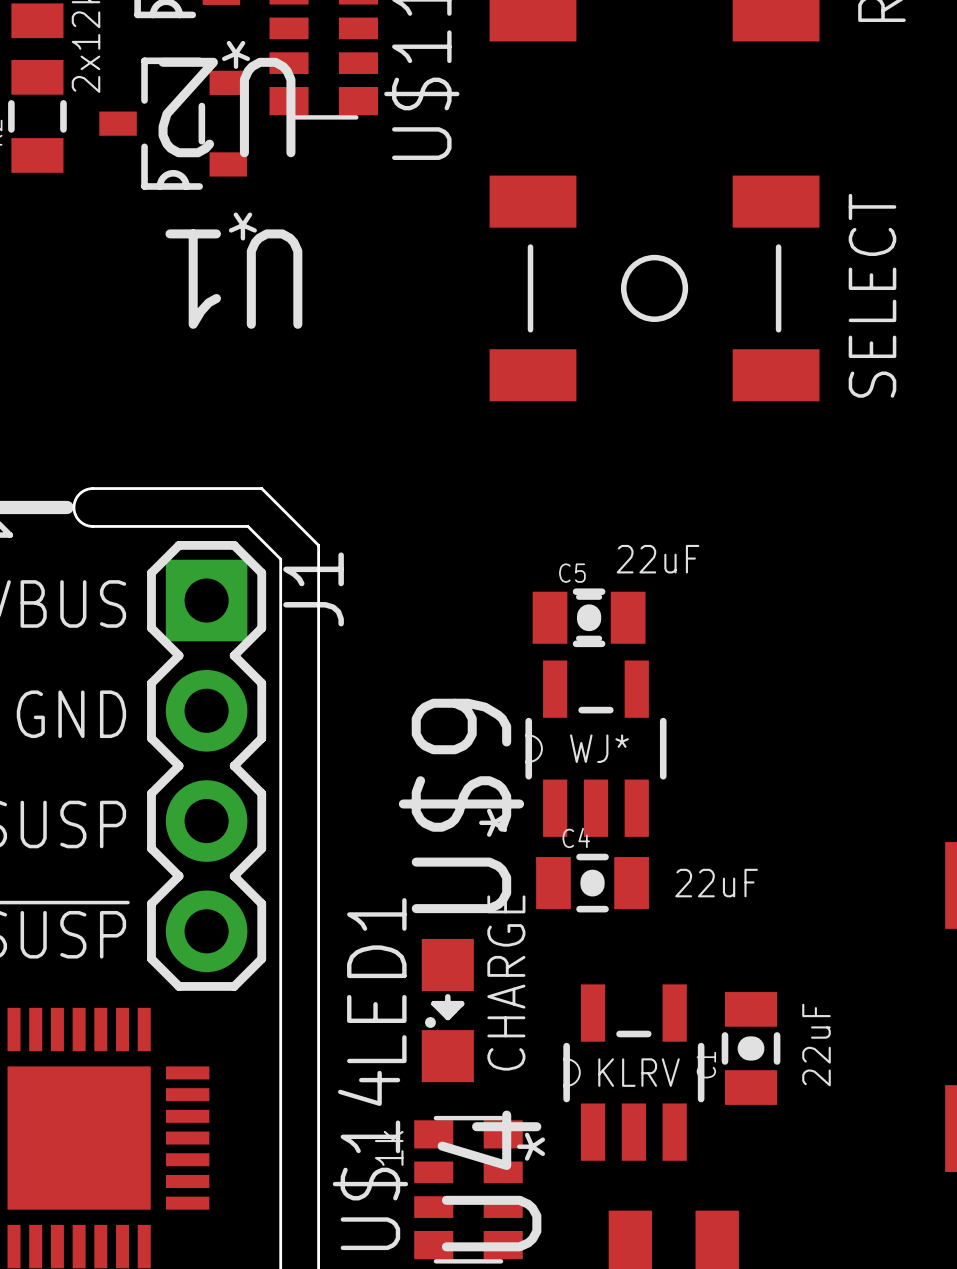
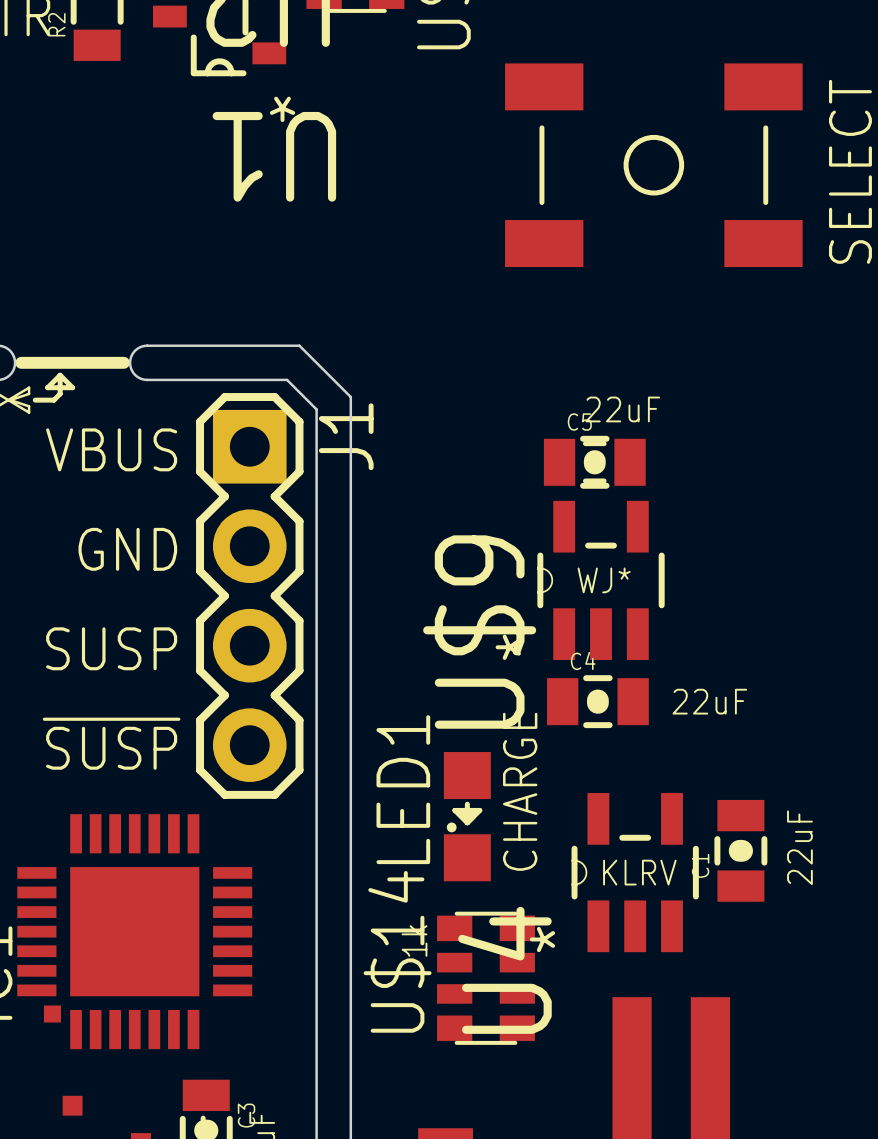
text position: 22uF (658, 559) -> 22uF (622, 409)

